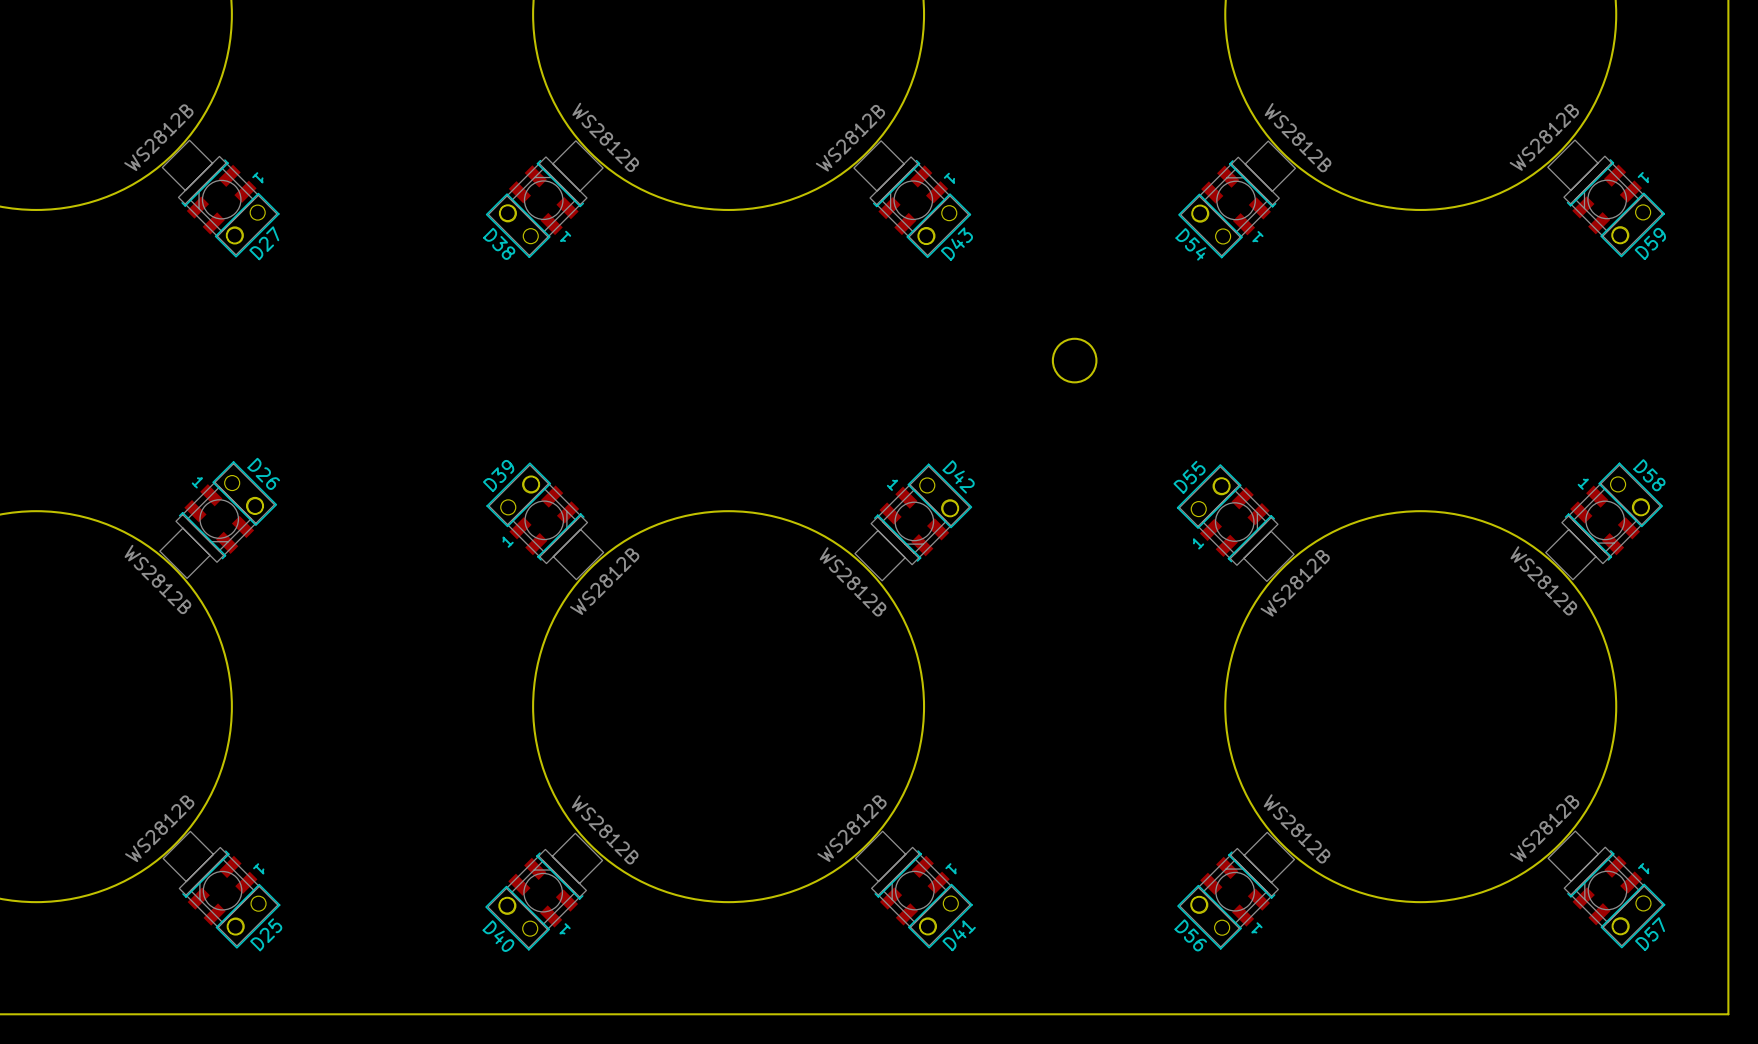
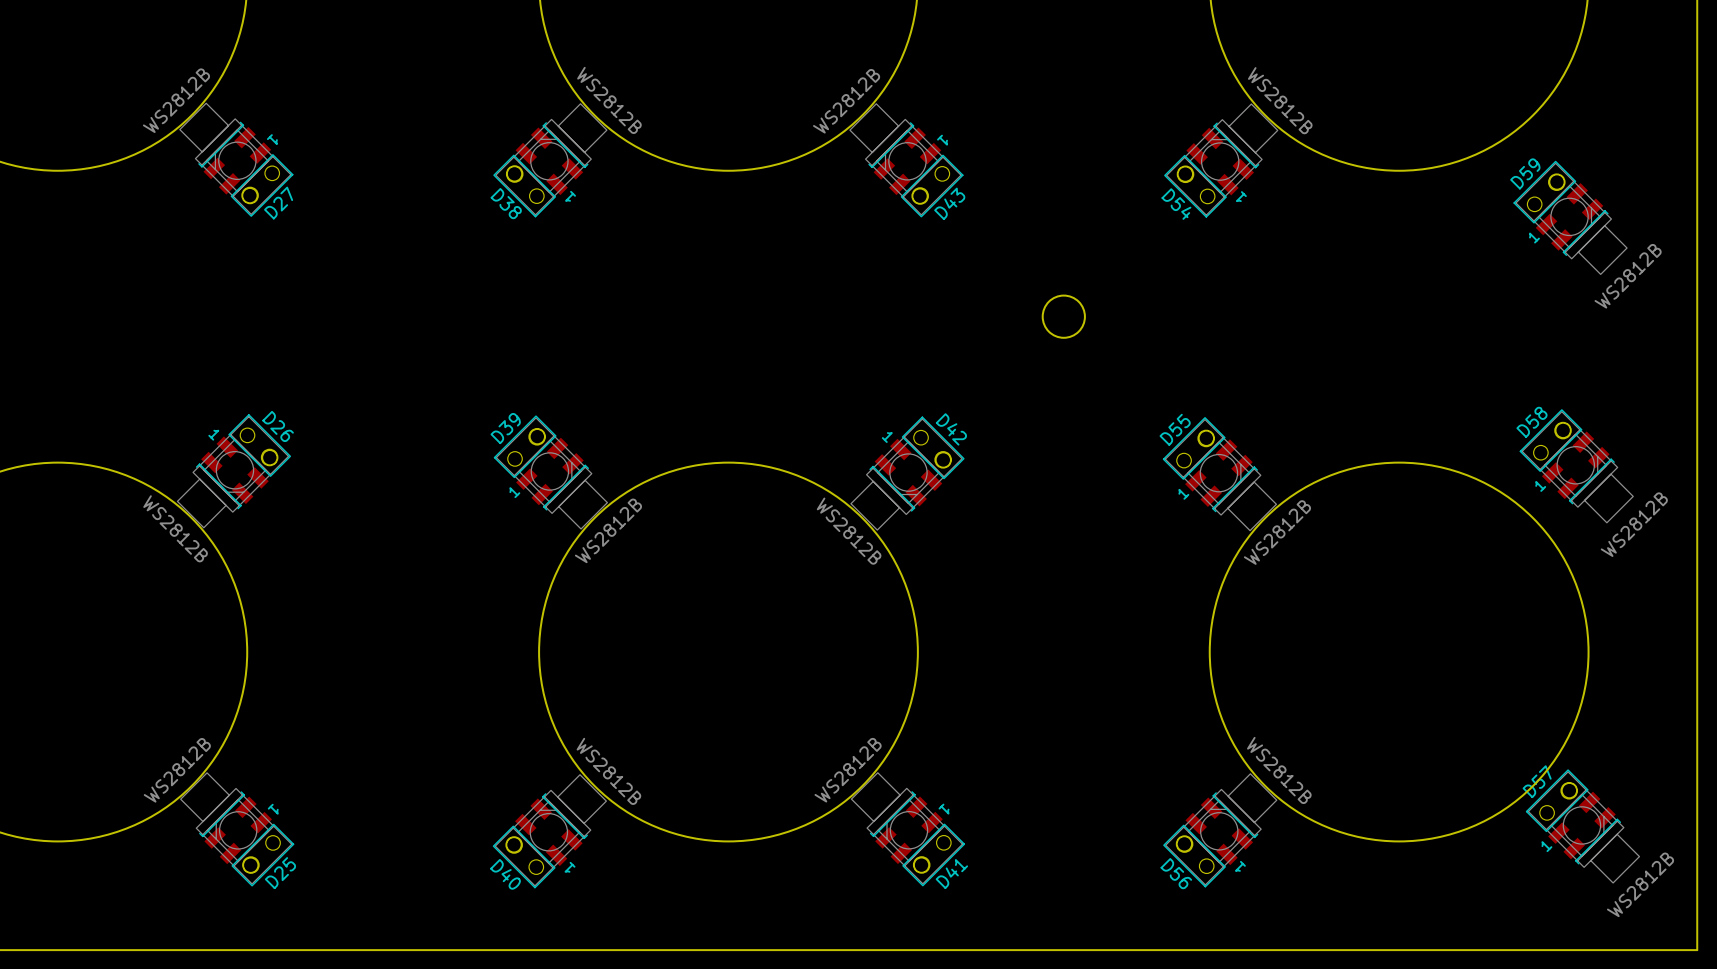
D59 rotation: 0° (1606, 198) -> 180° (1570, 217)
D58 rotation: 0° (1604, 521) -> 90° counterclockwise (1576, 466)
D57 rotation: 0° (1606, 889) -> 180° (1582, 826)

